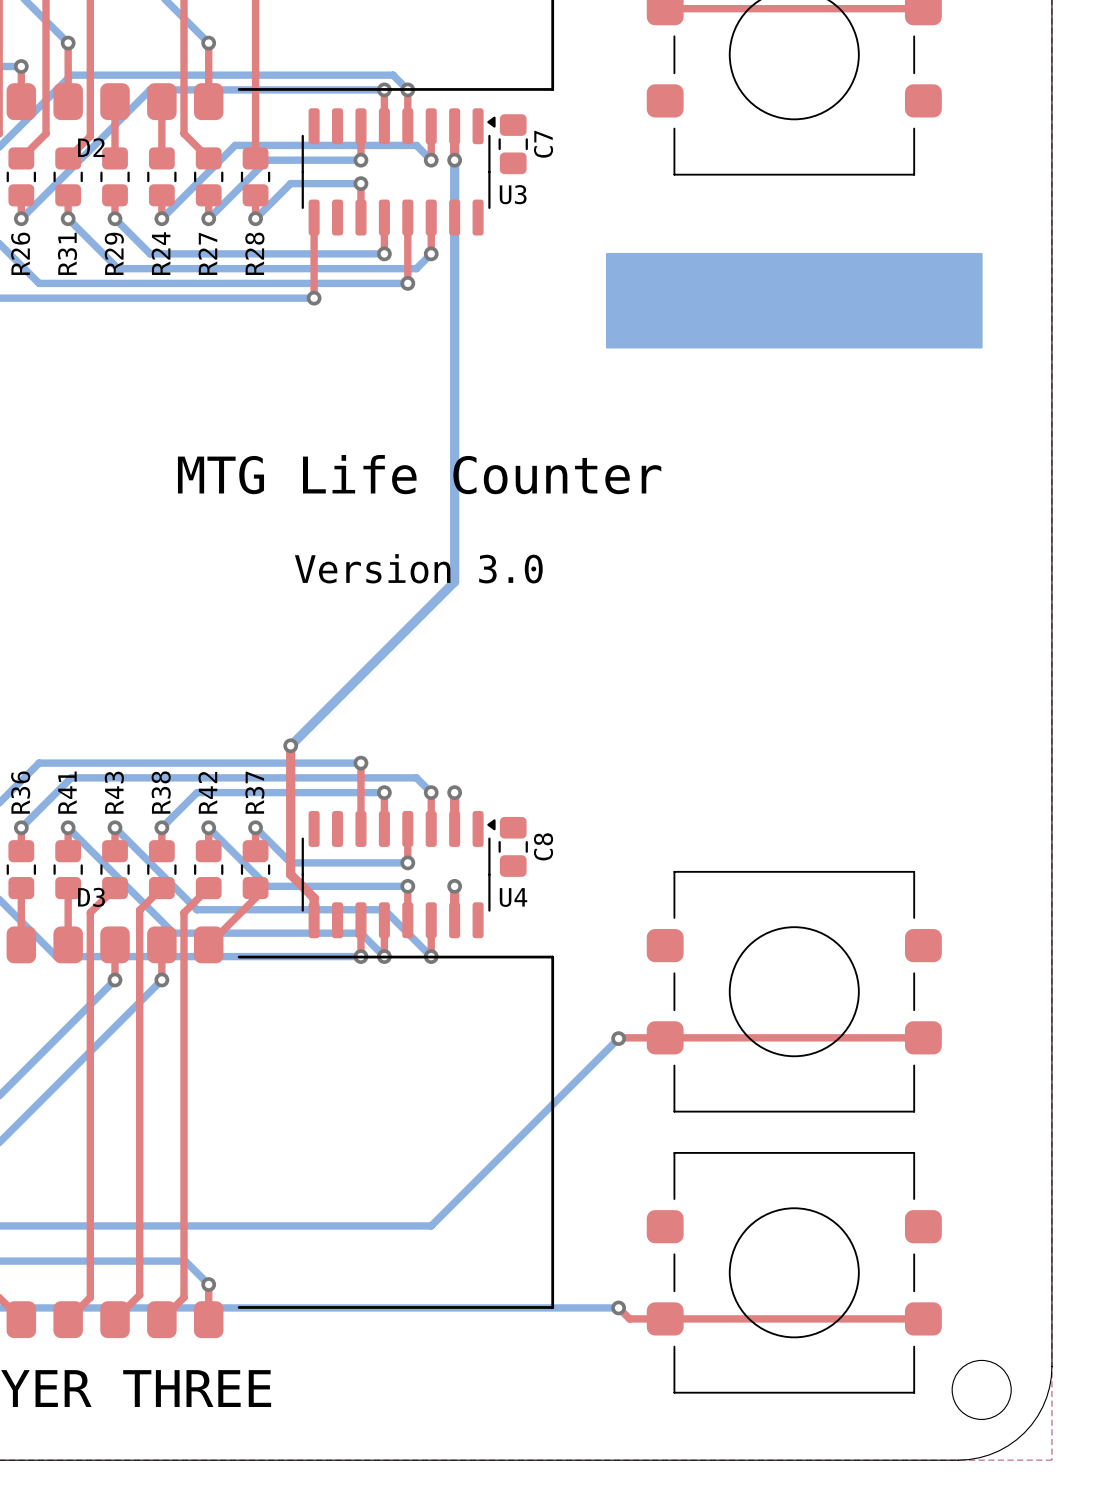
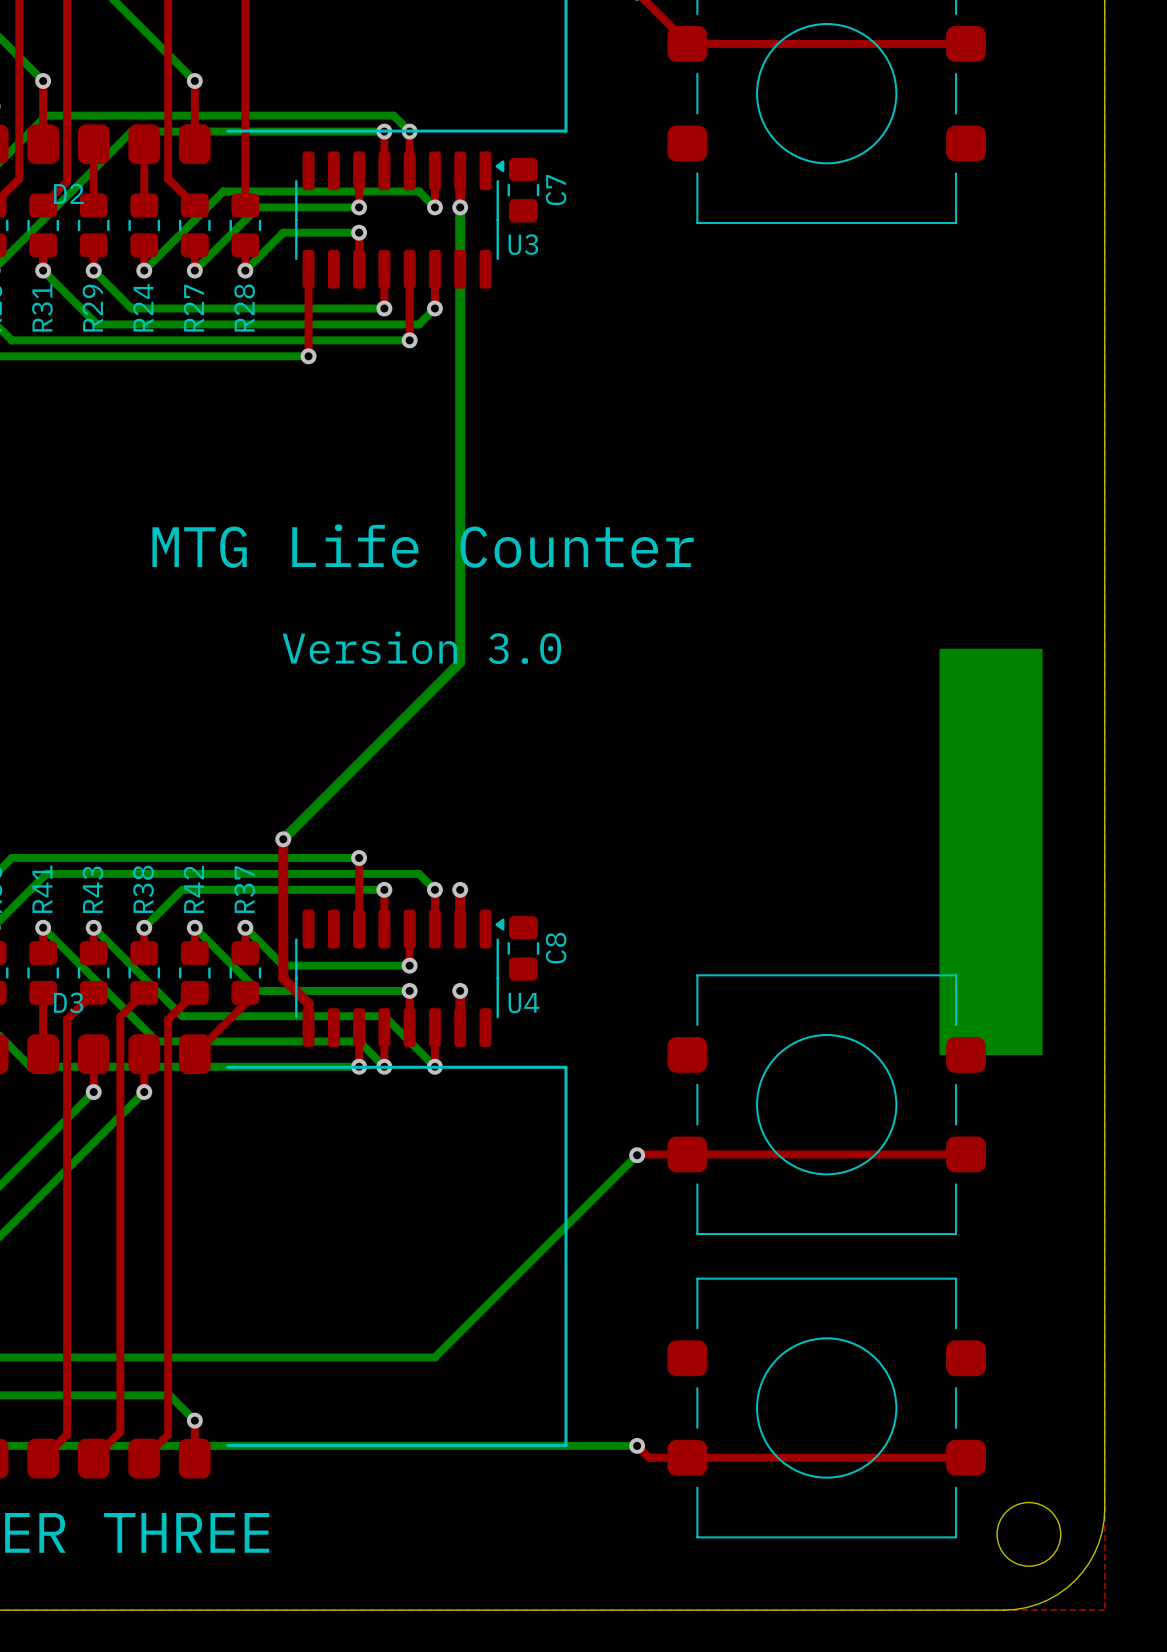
drawing: [605, 252, 983, 349] -> none
drawing: none -> [939, 648, 1043, 1056]

